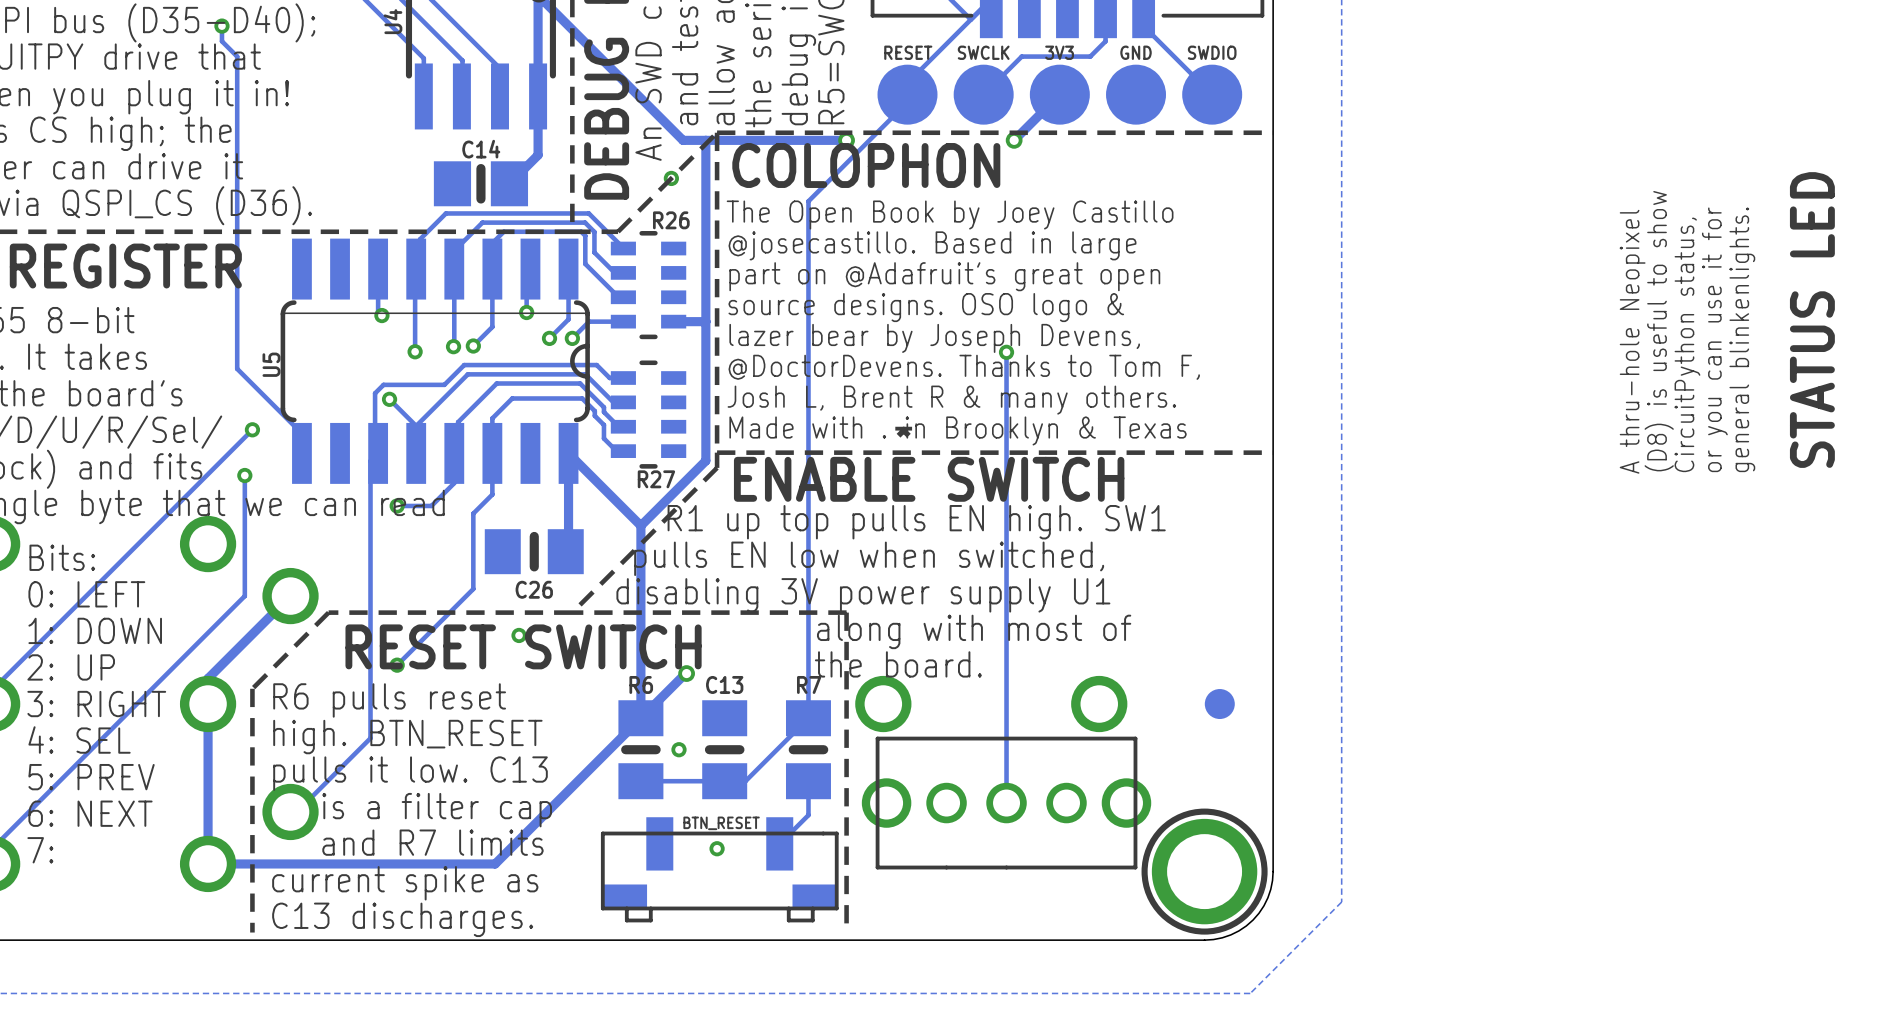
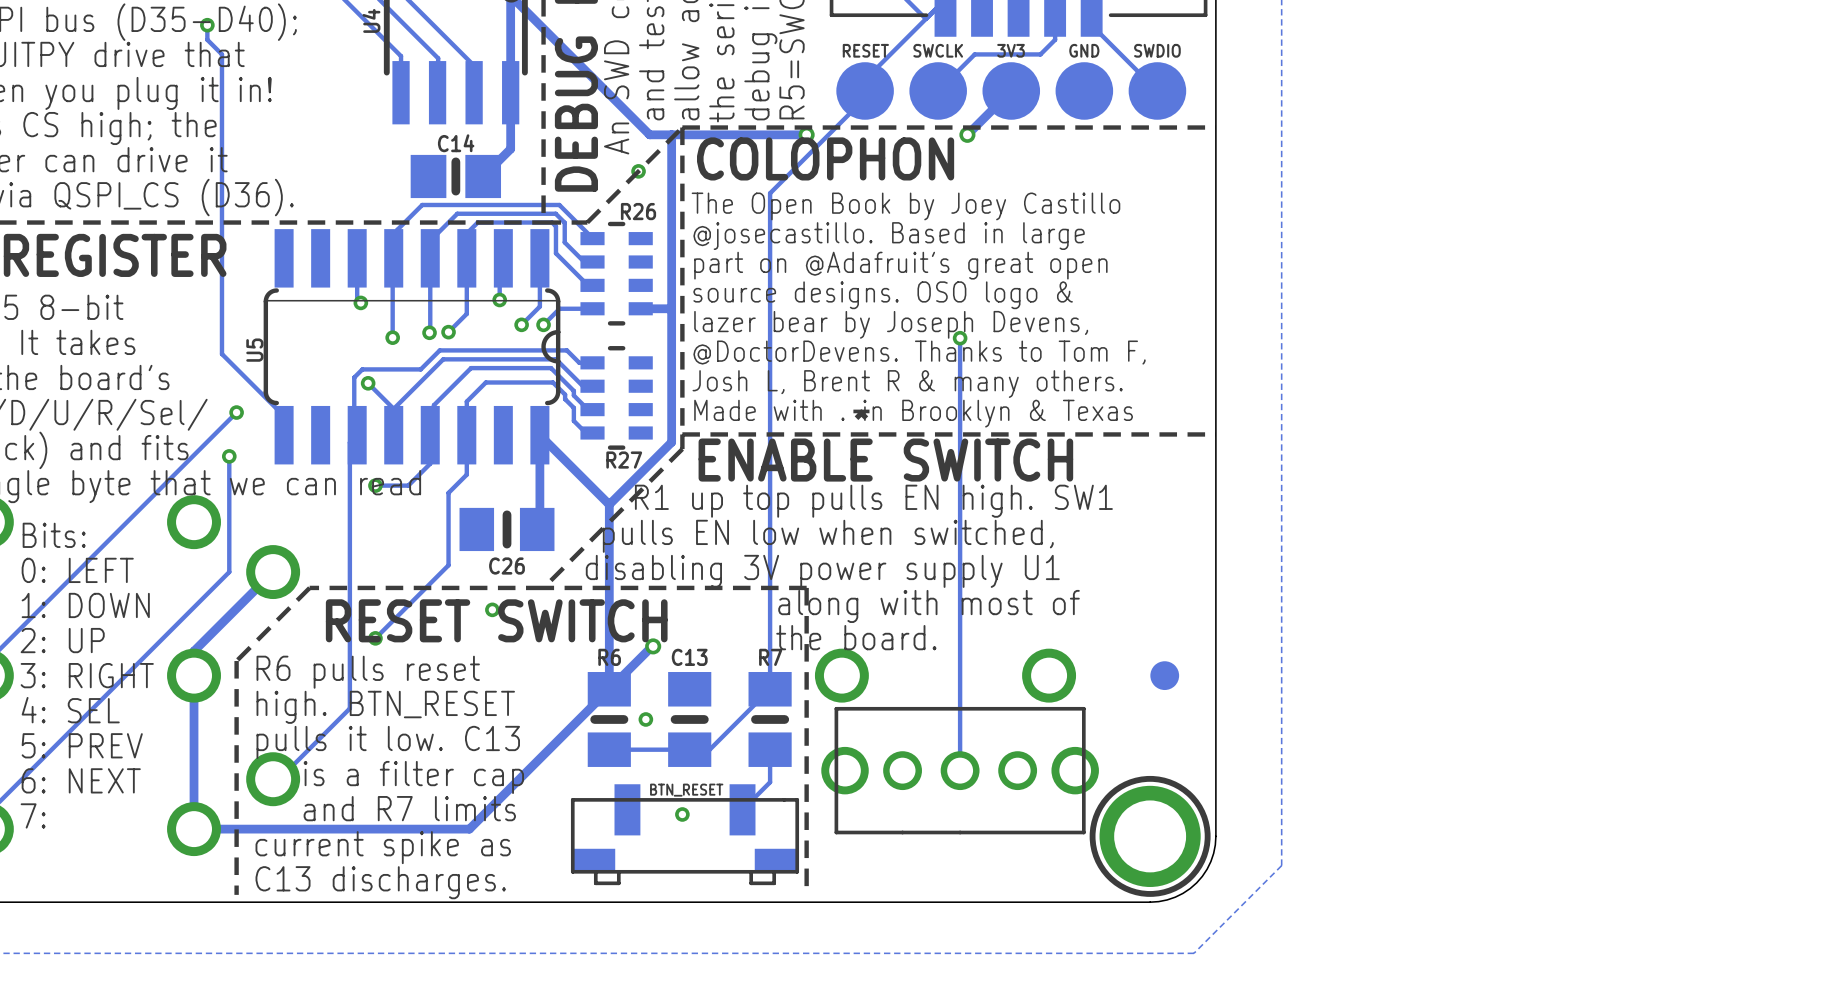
text: STATUS LED (1812, 320) -> none
text: (D8) is useful to show (1659, 331) -> none
text: or you can use it for (1714, 339) -> none
text: general blinkenlights. (1742, 339) -> none
text: A thru-hole Neopixel (1632, 341) -> none
text: CircuitPython status, (1687, 344) -> none

